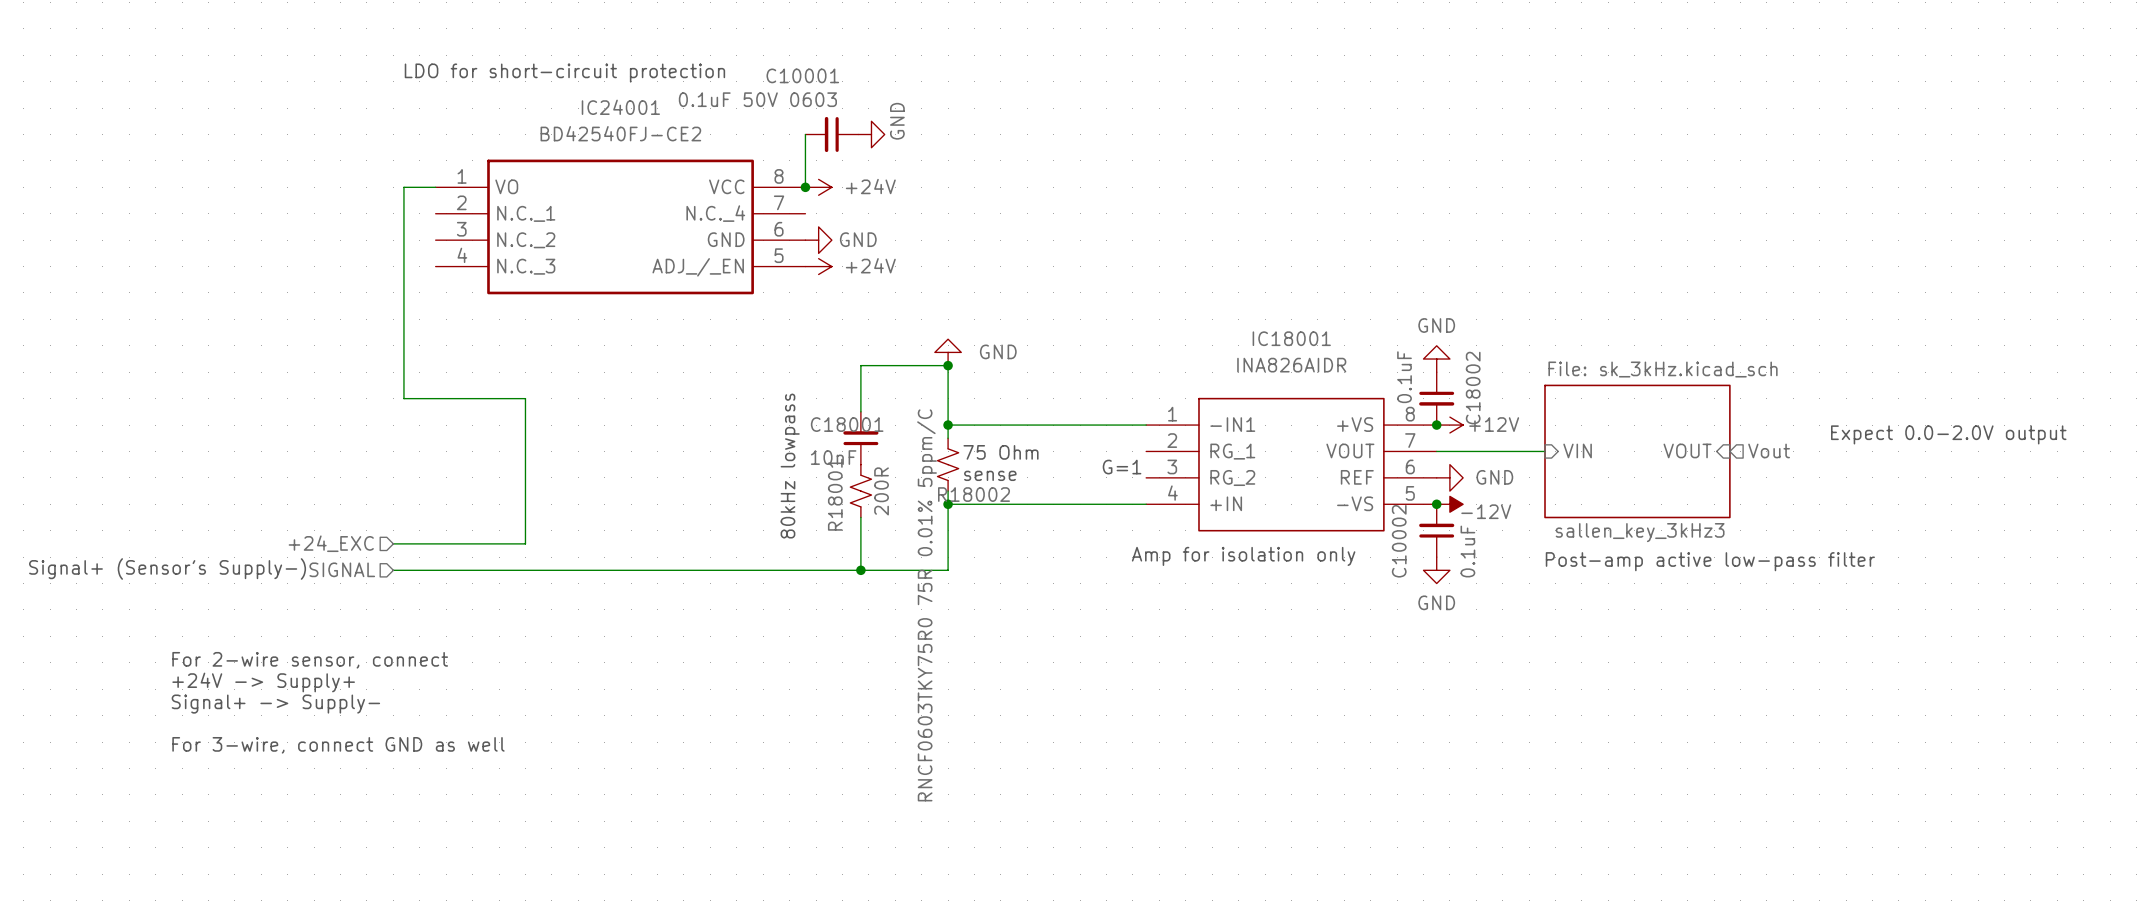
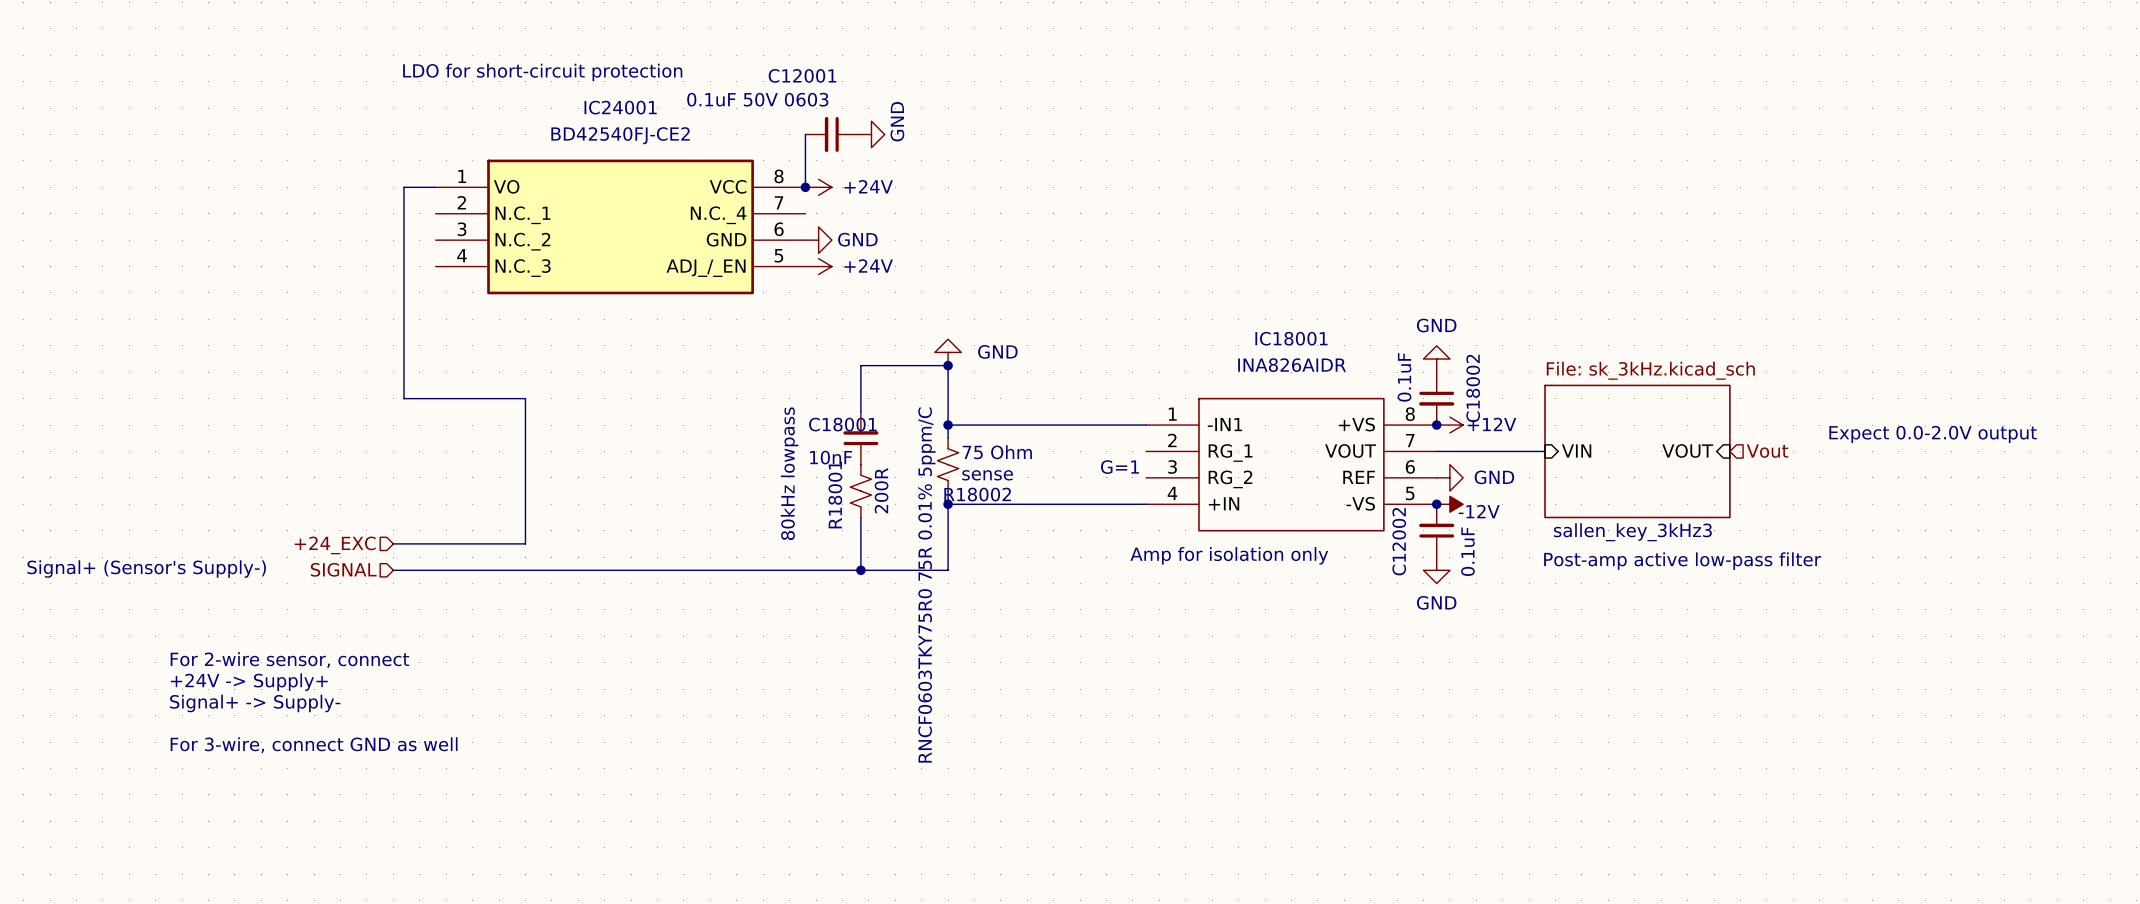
C10001 name: C10001 (802, 75) -> C12001 (802, 75)
C10002 name: C10002 (1399, 541) -> C12002 (1399, 541)

